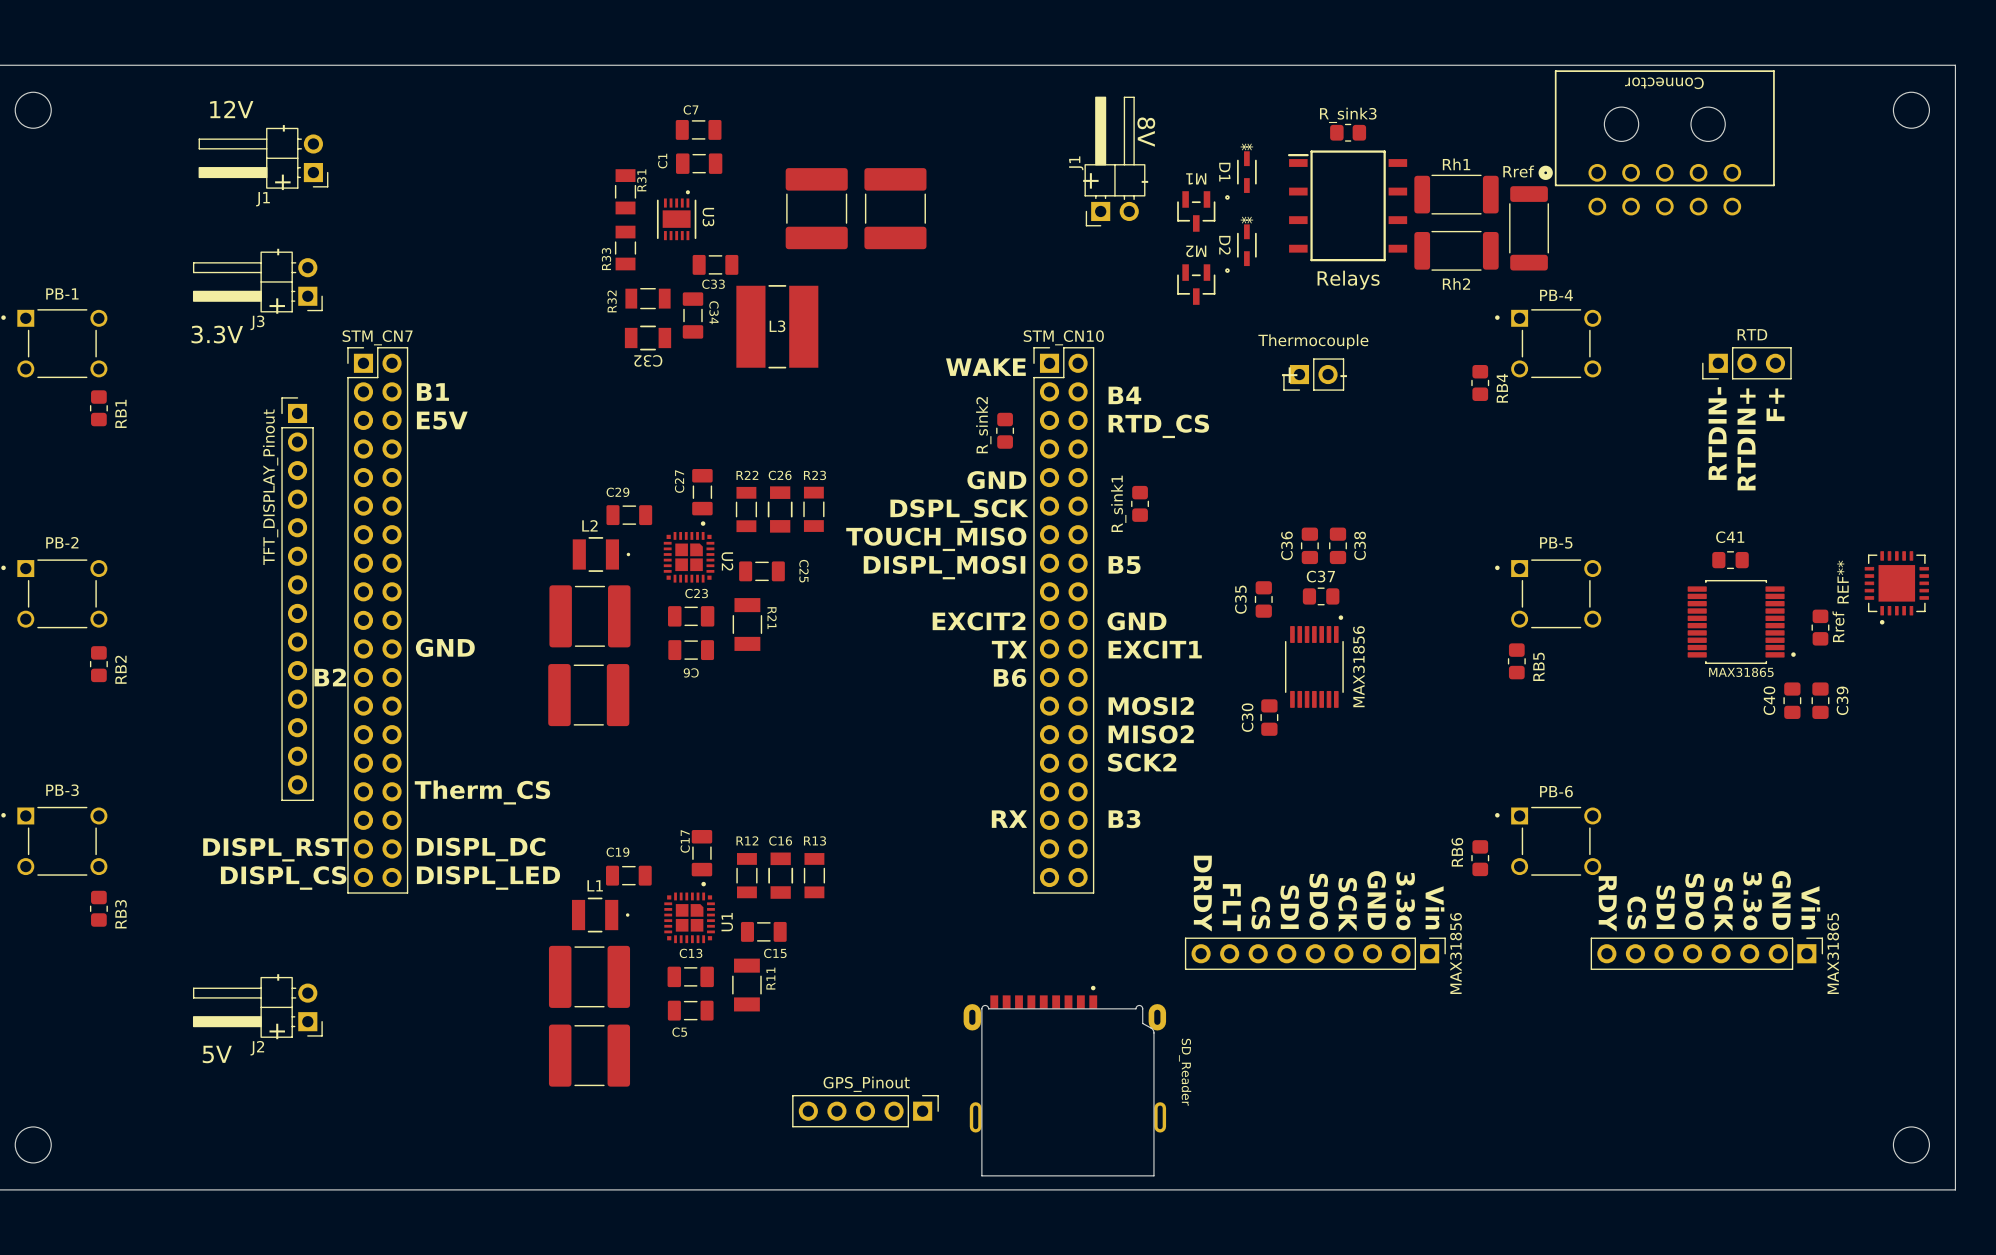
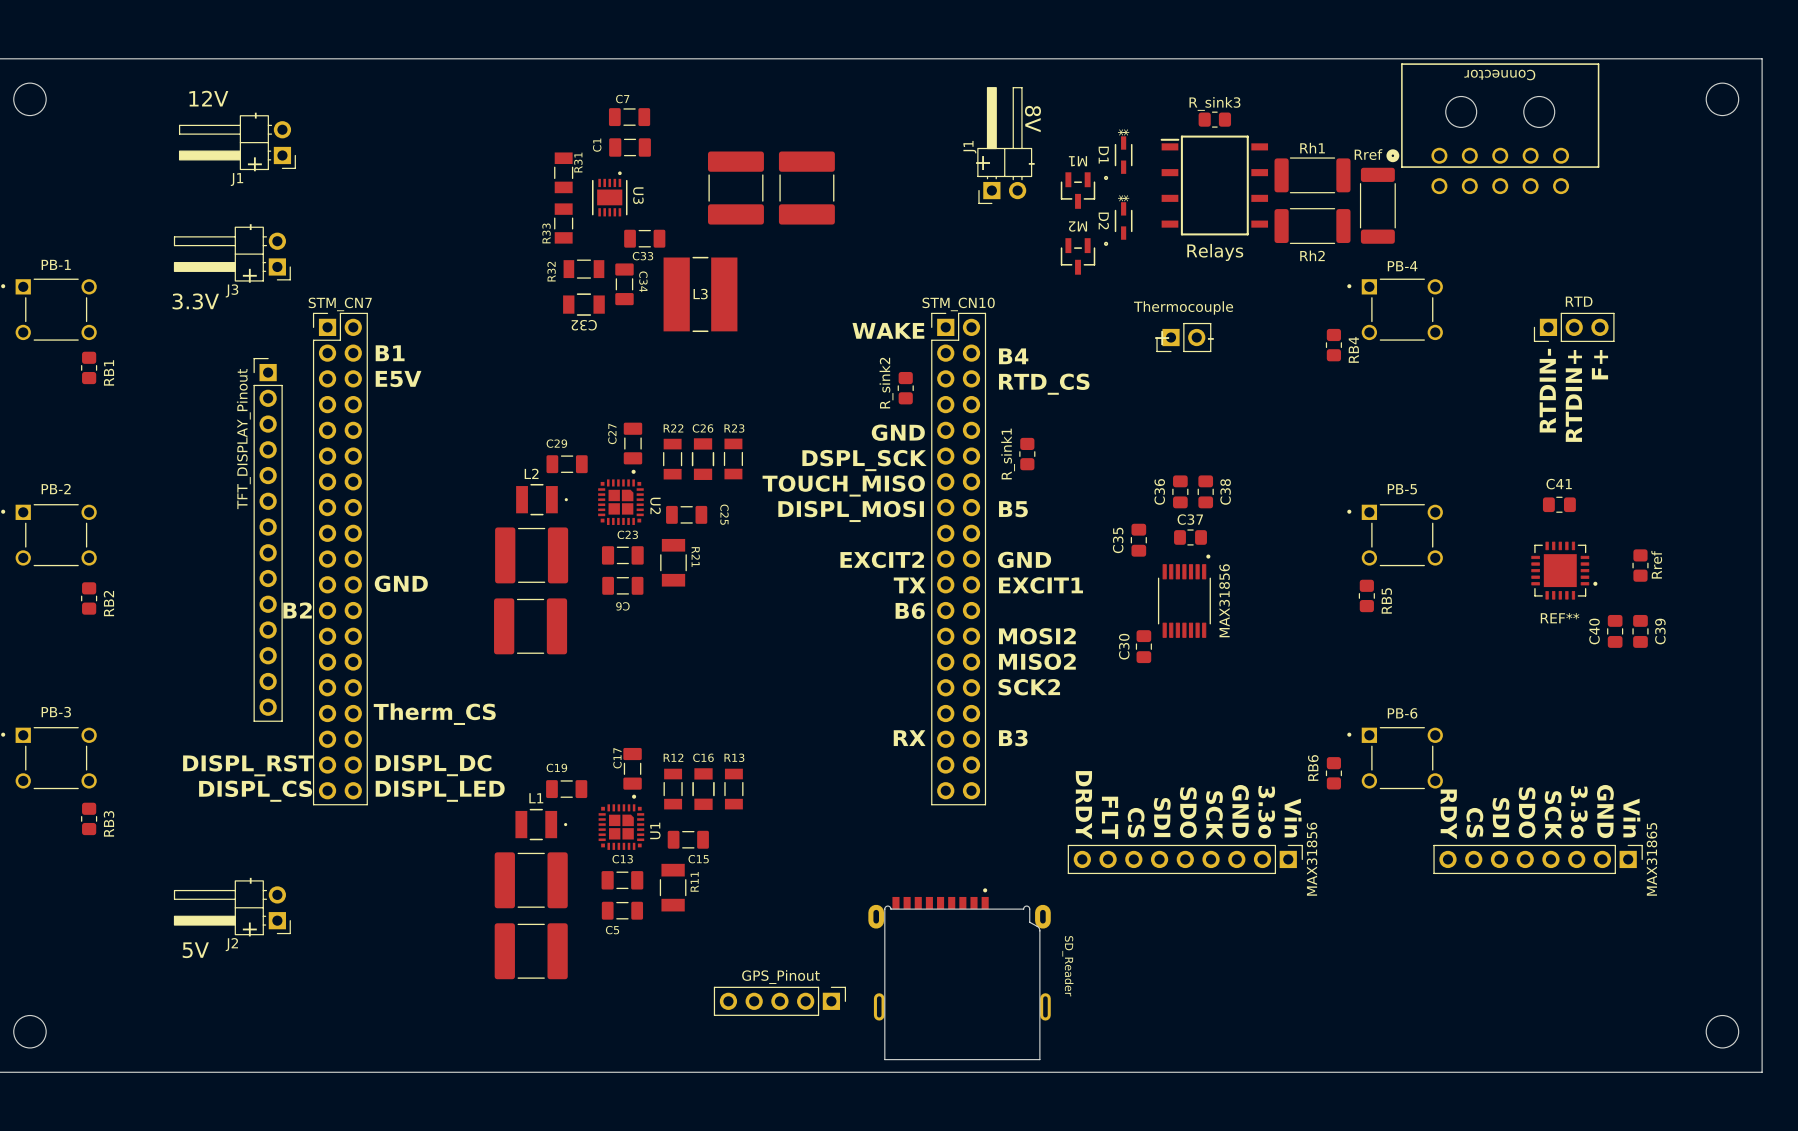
REF** rotation: 0° (1896, 587) -> 90° counterclockwise (1564, 570)
REF** position: (1896, 587) -> (1564, 570)
MAX31865: (1741, 621) -> none

